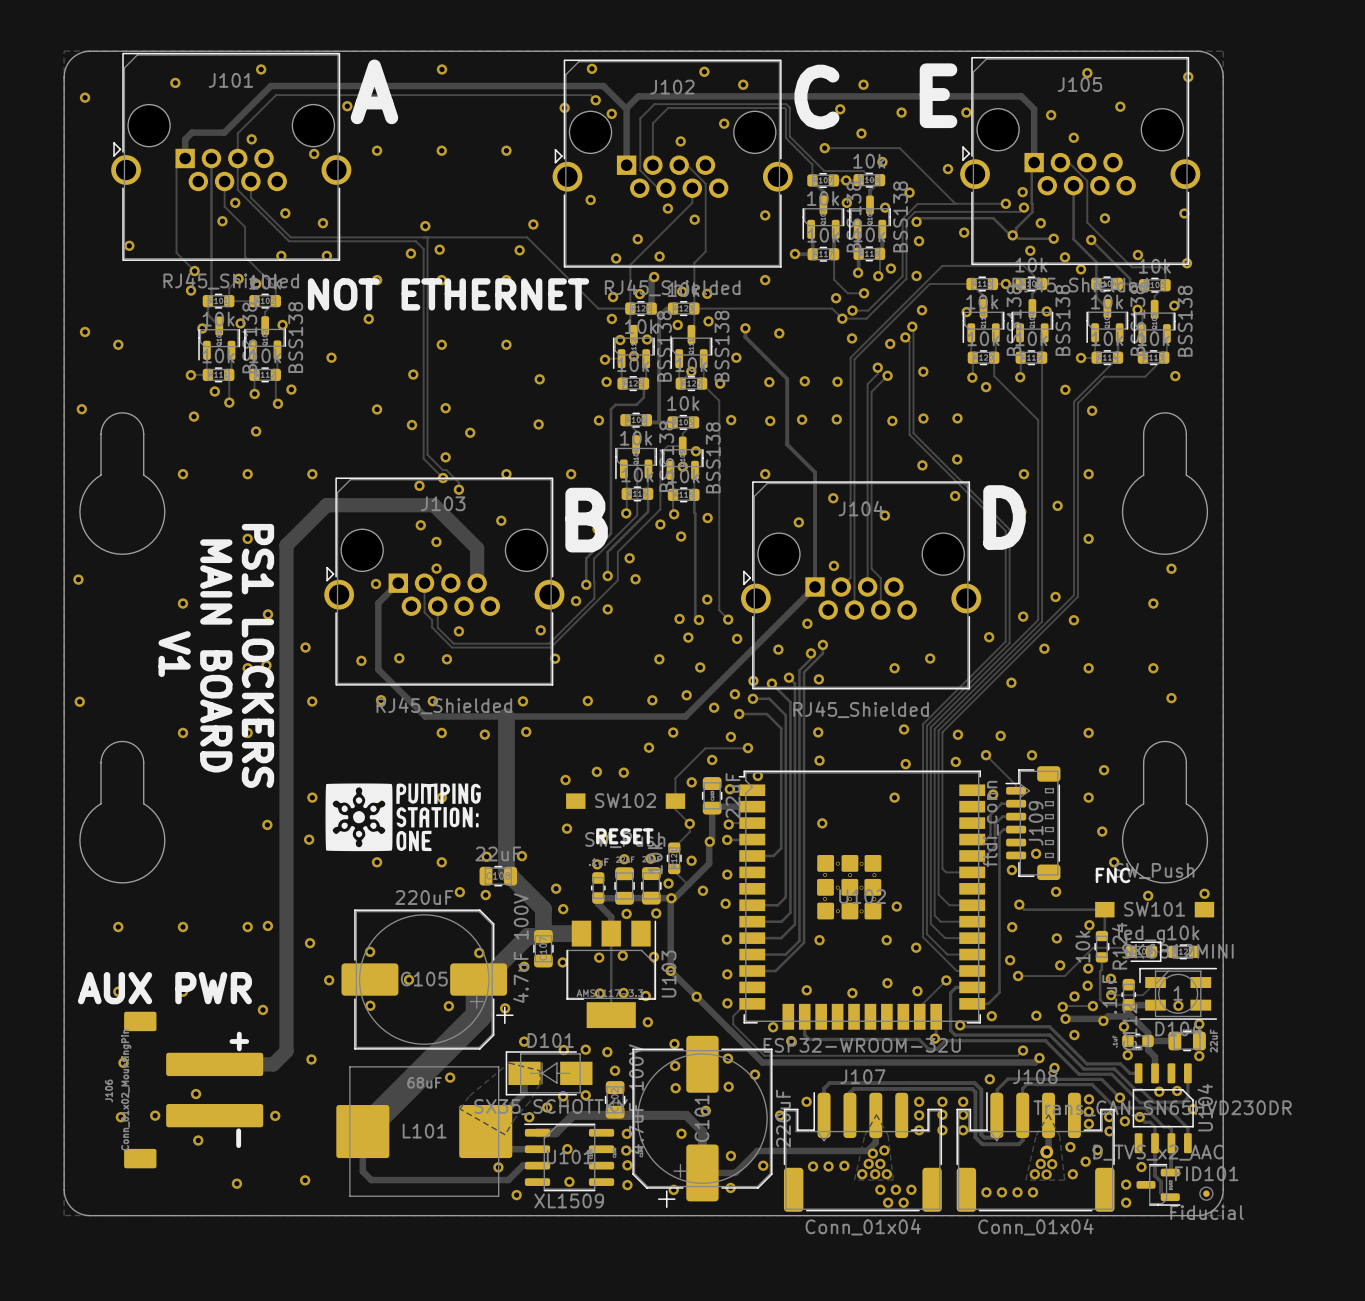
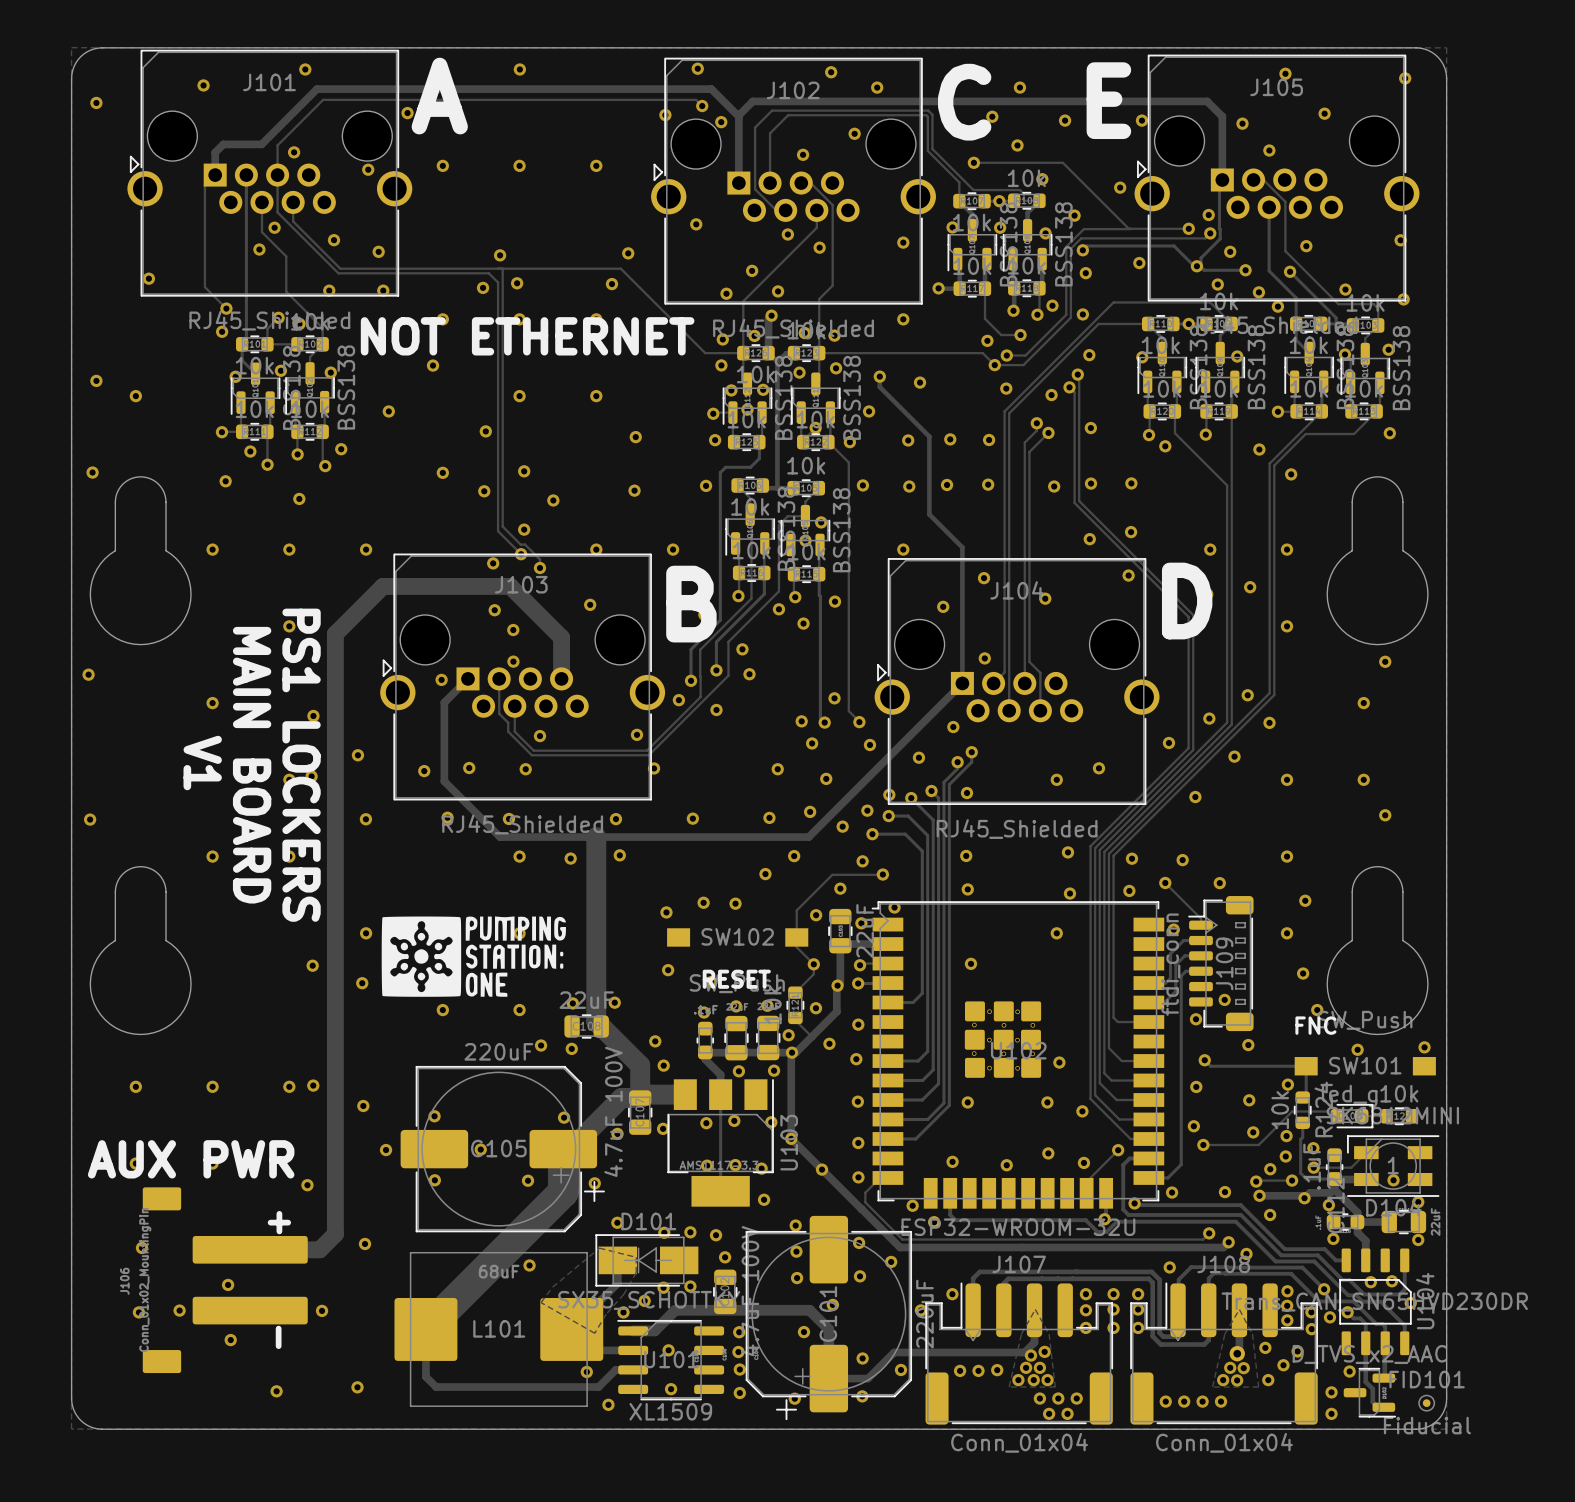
via: none -> (952, 227)

